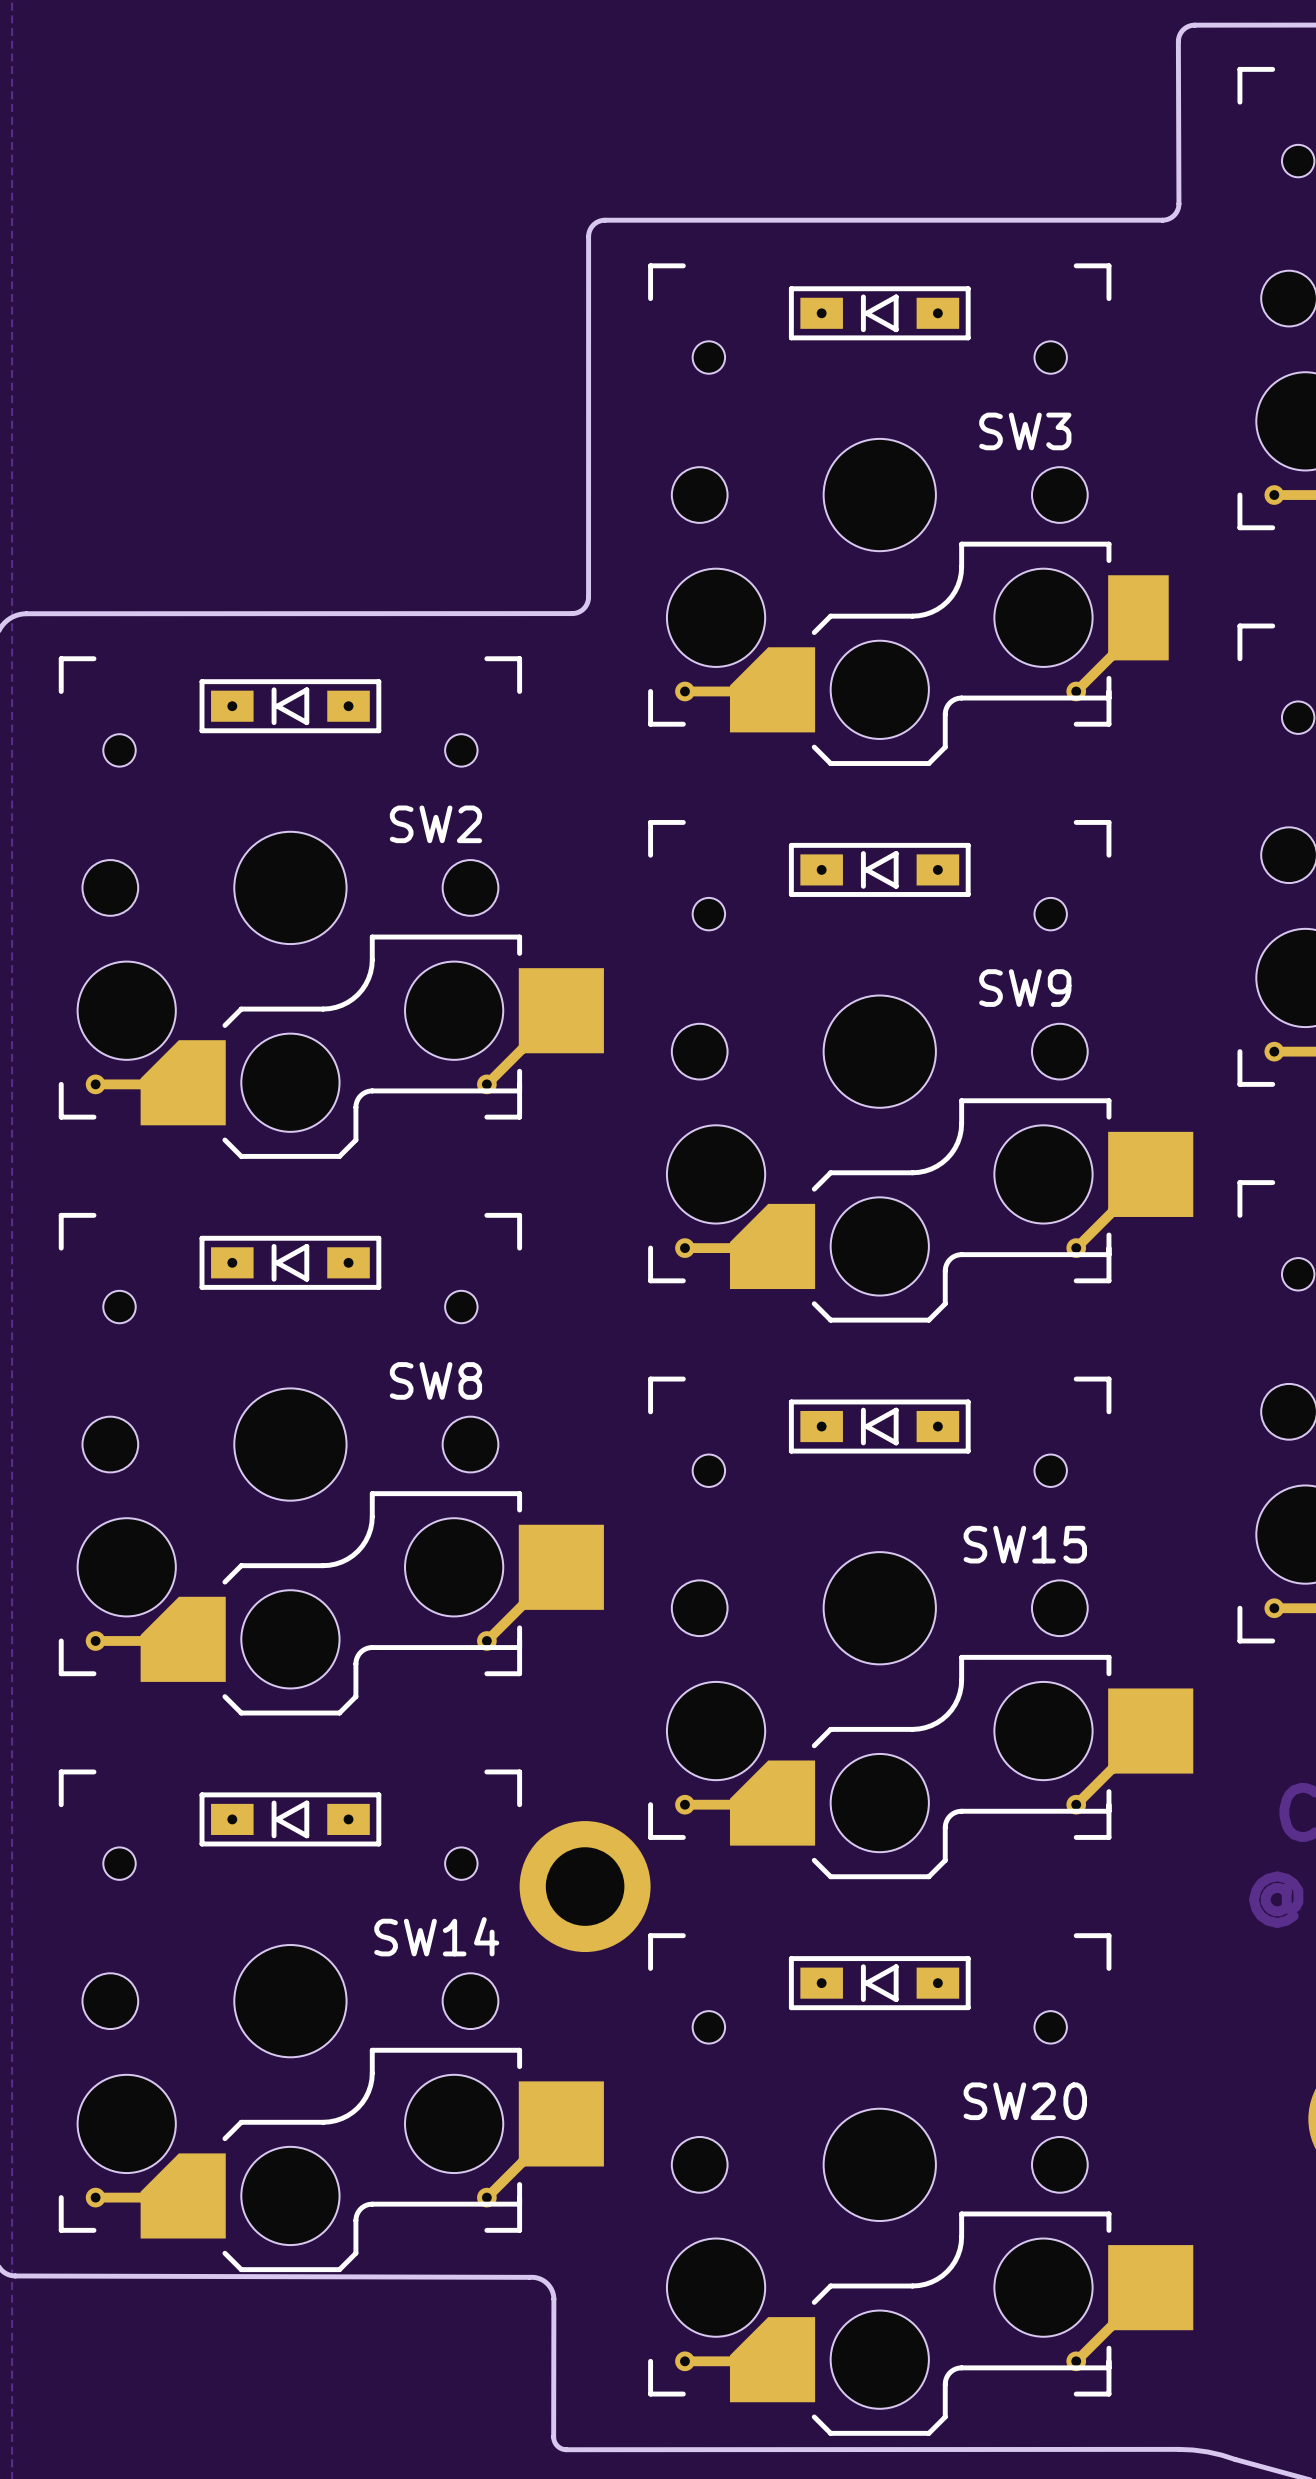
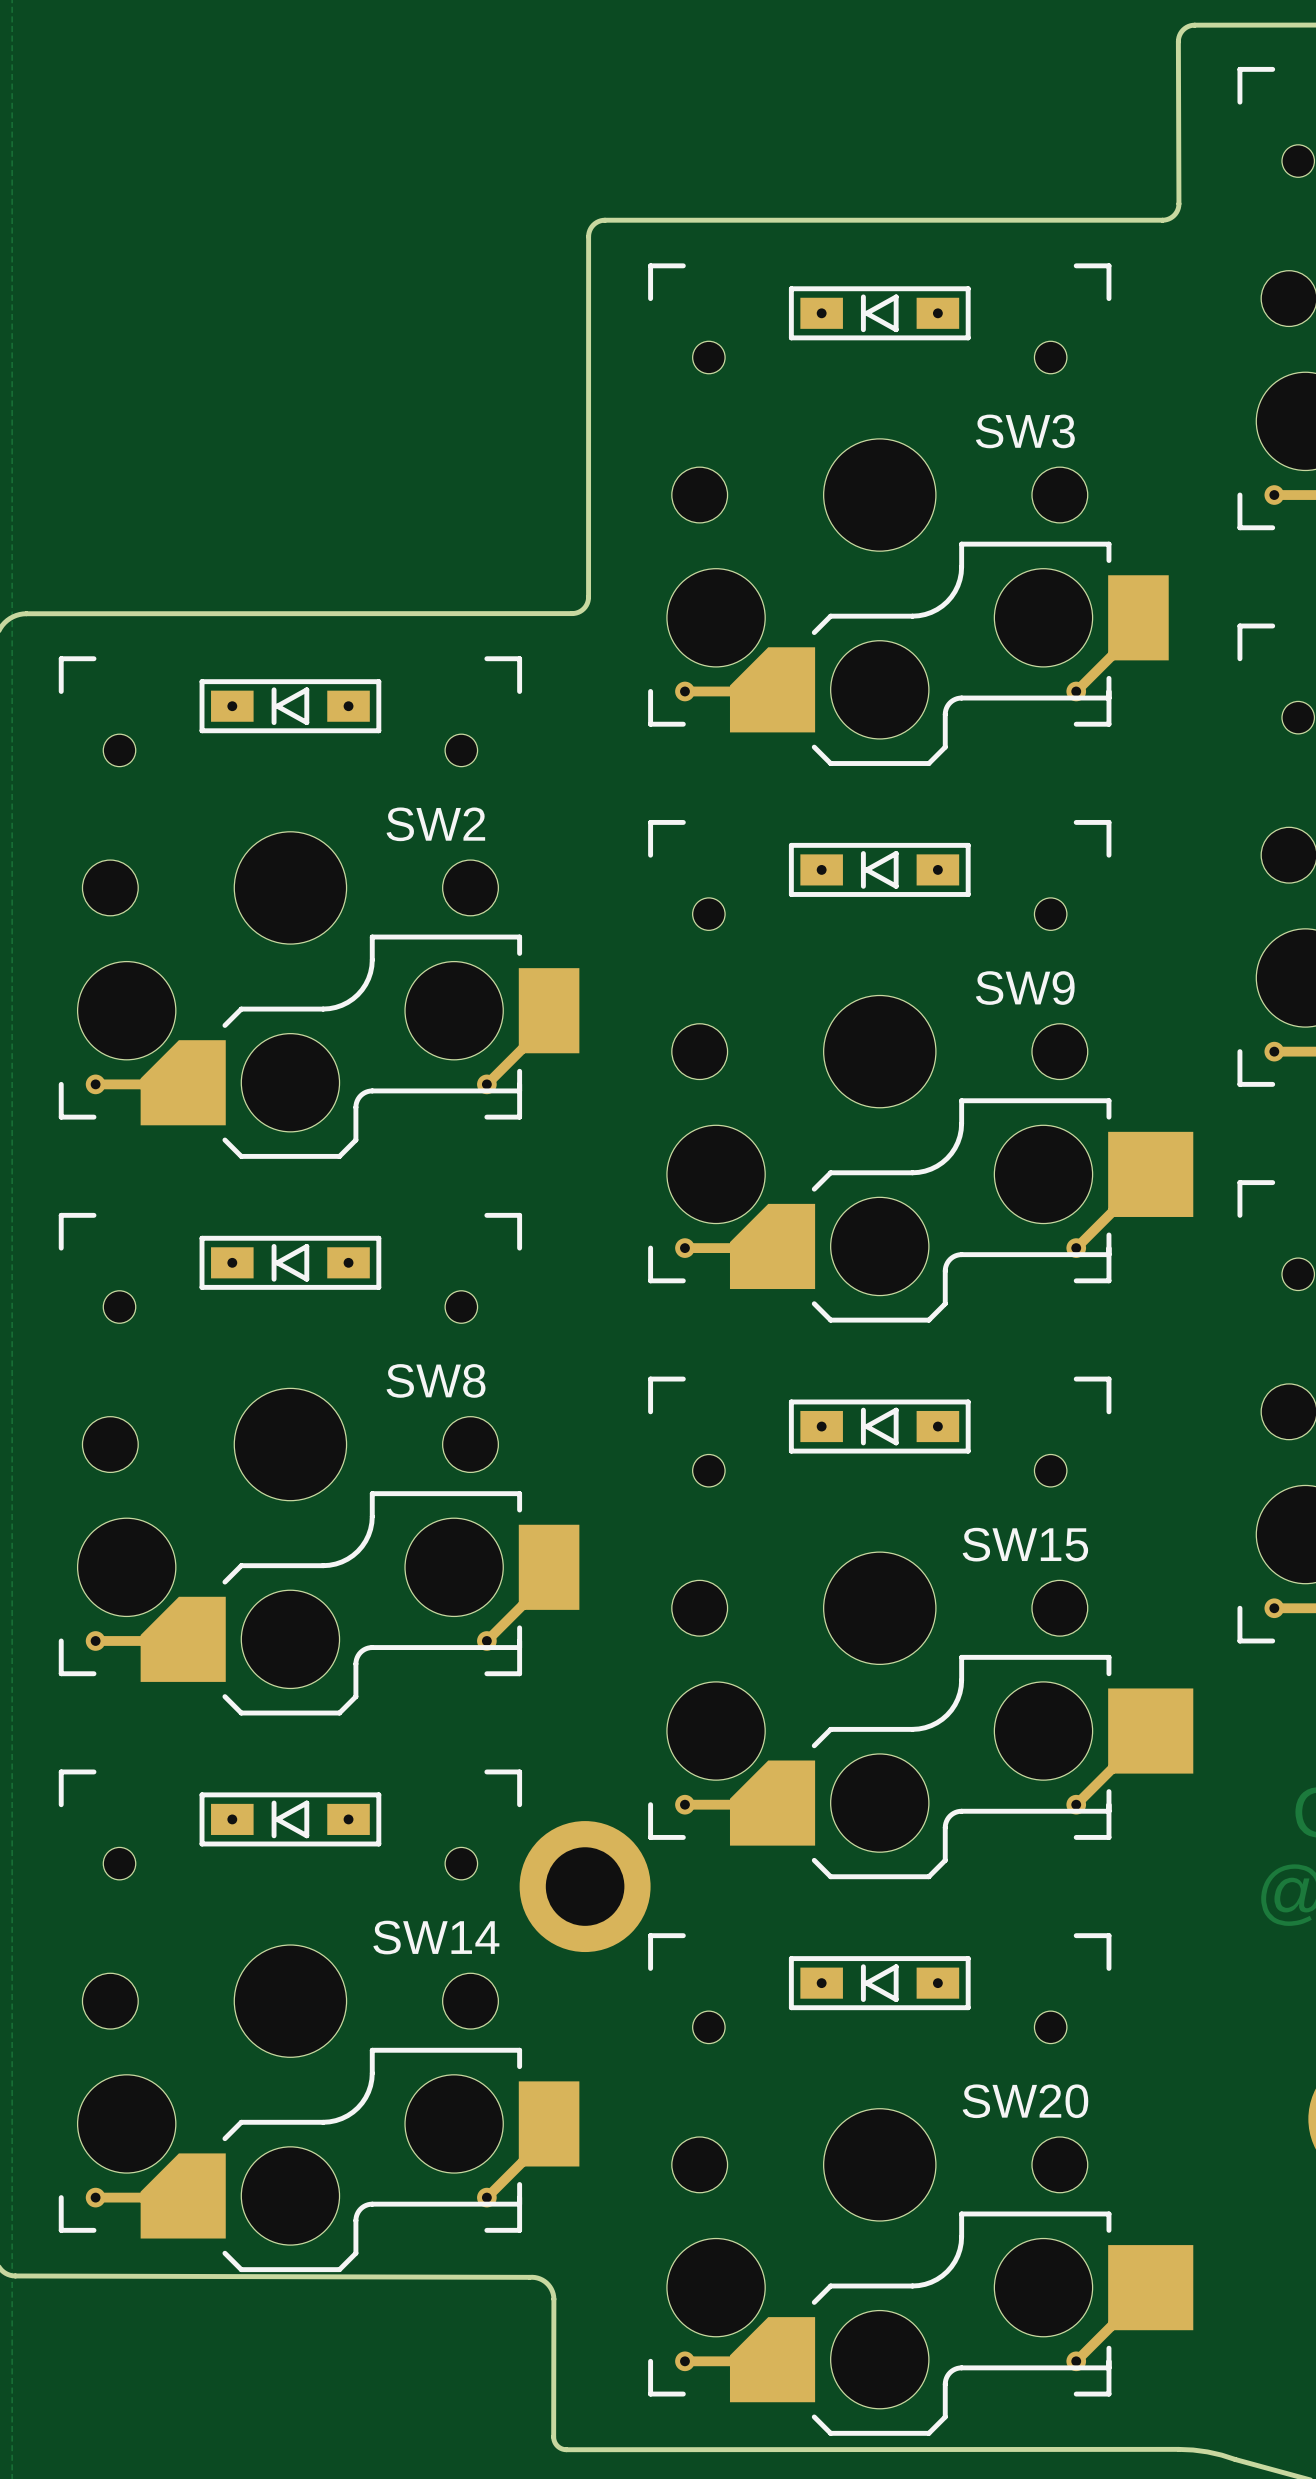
SW2 footprint: [58, 656, 604, 1159] -> [58, 656, 580, 1159]
SW8 footprint: [58, 1212, 604, 1716] -> [58, 1212, 580, 1716]
SW14 footprint: [58, 1769, 604, 2273] -> [58, 1769, 580, 2273]

